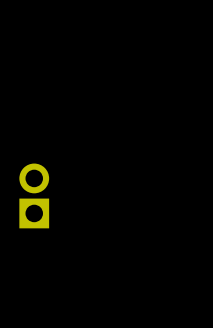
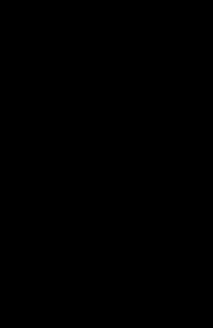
part: (34, 195) -> none

